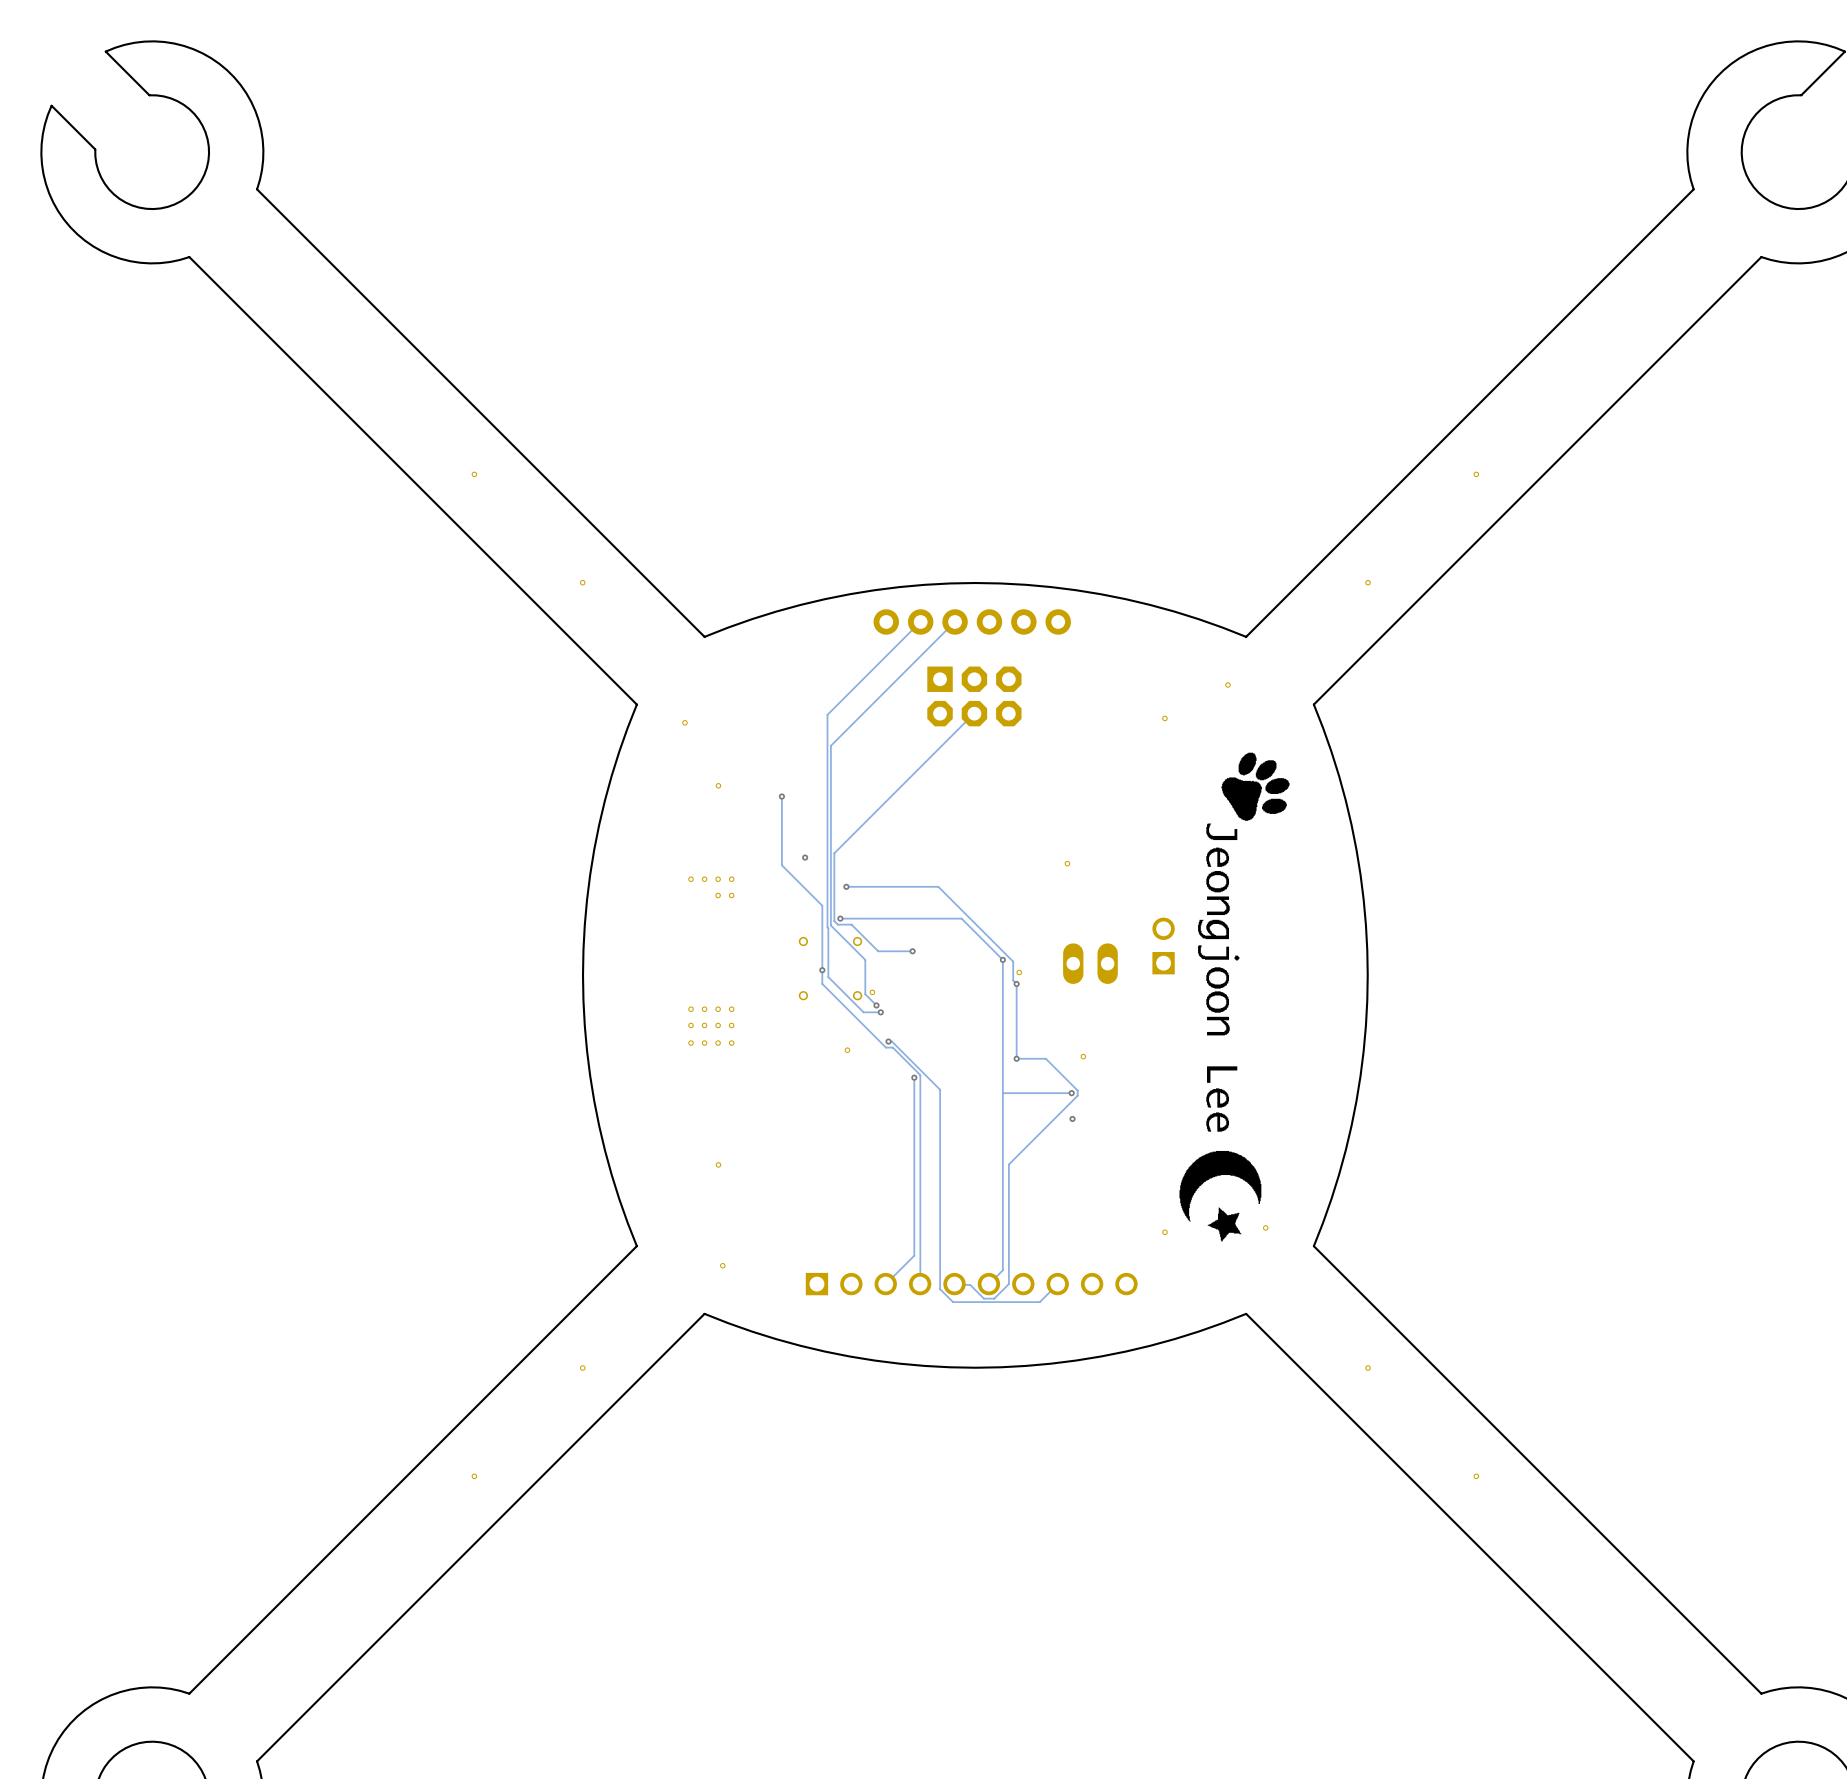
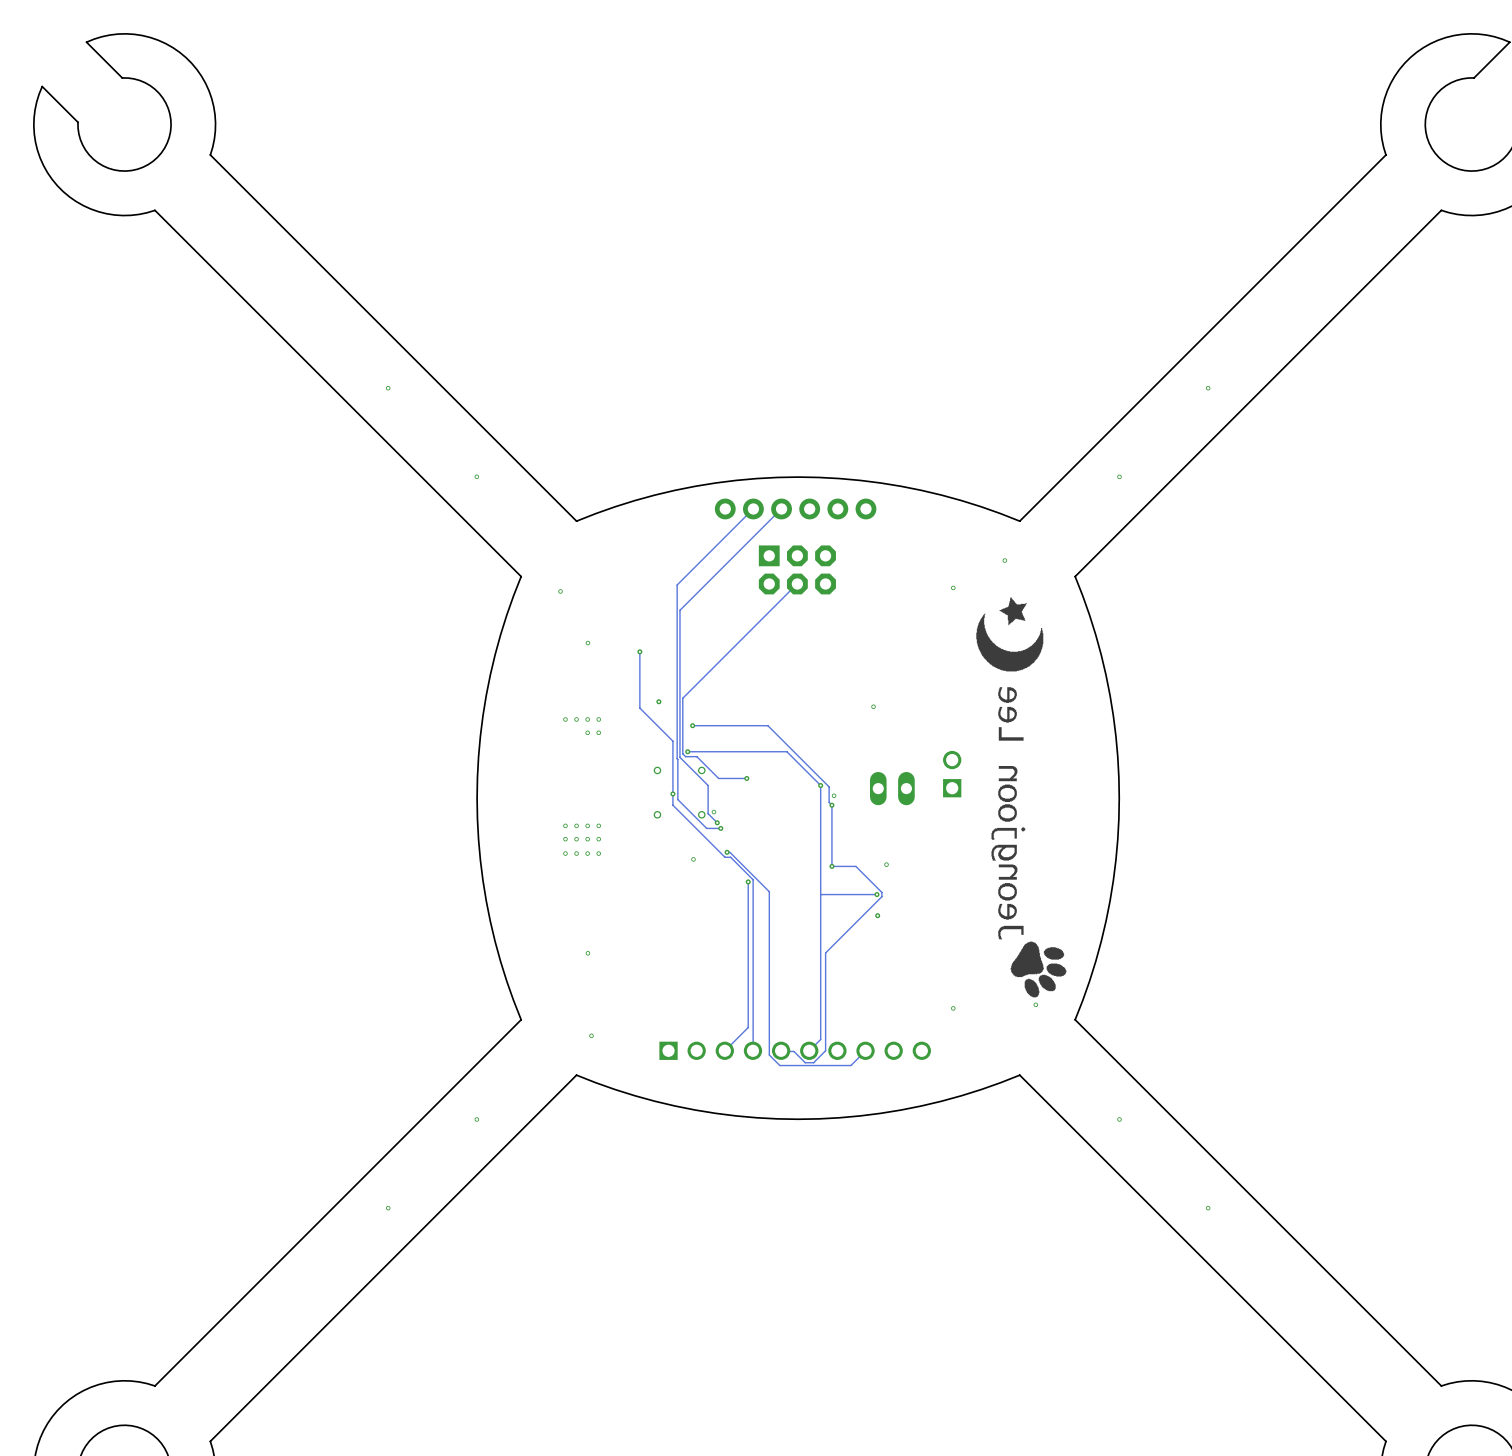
drawing: none -> [976, 597, 1067, 998]
drawing: [1179, 752, 1290, 1242] -> none

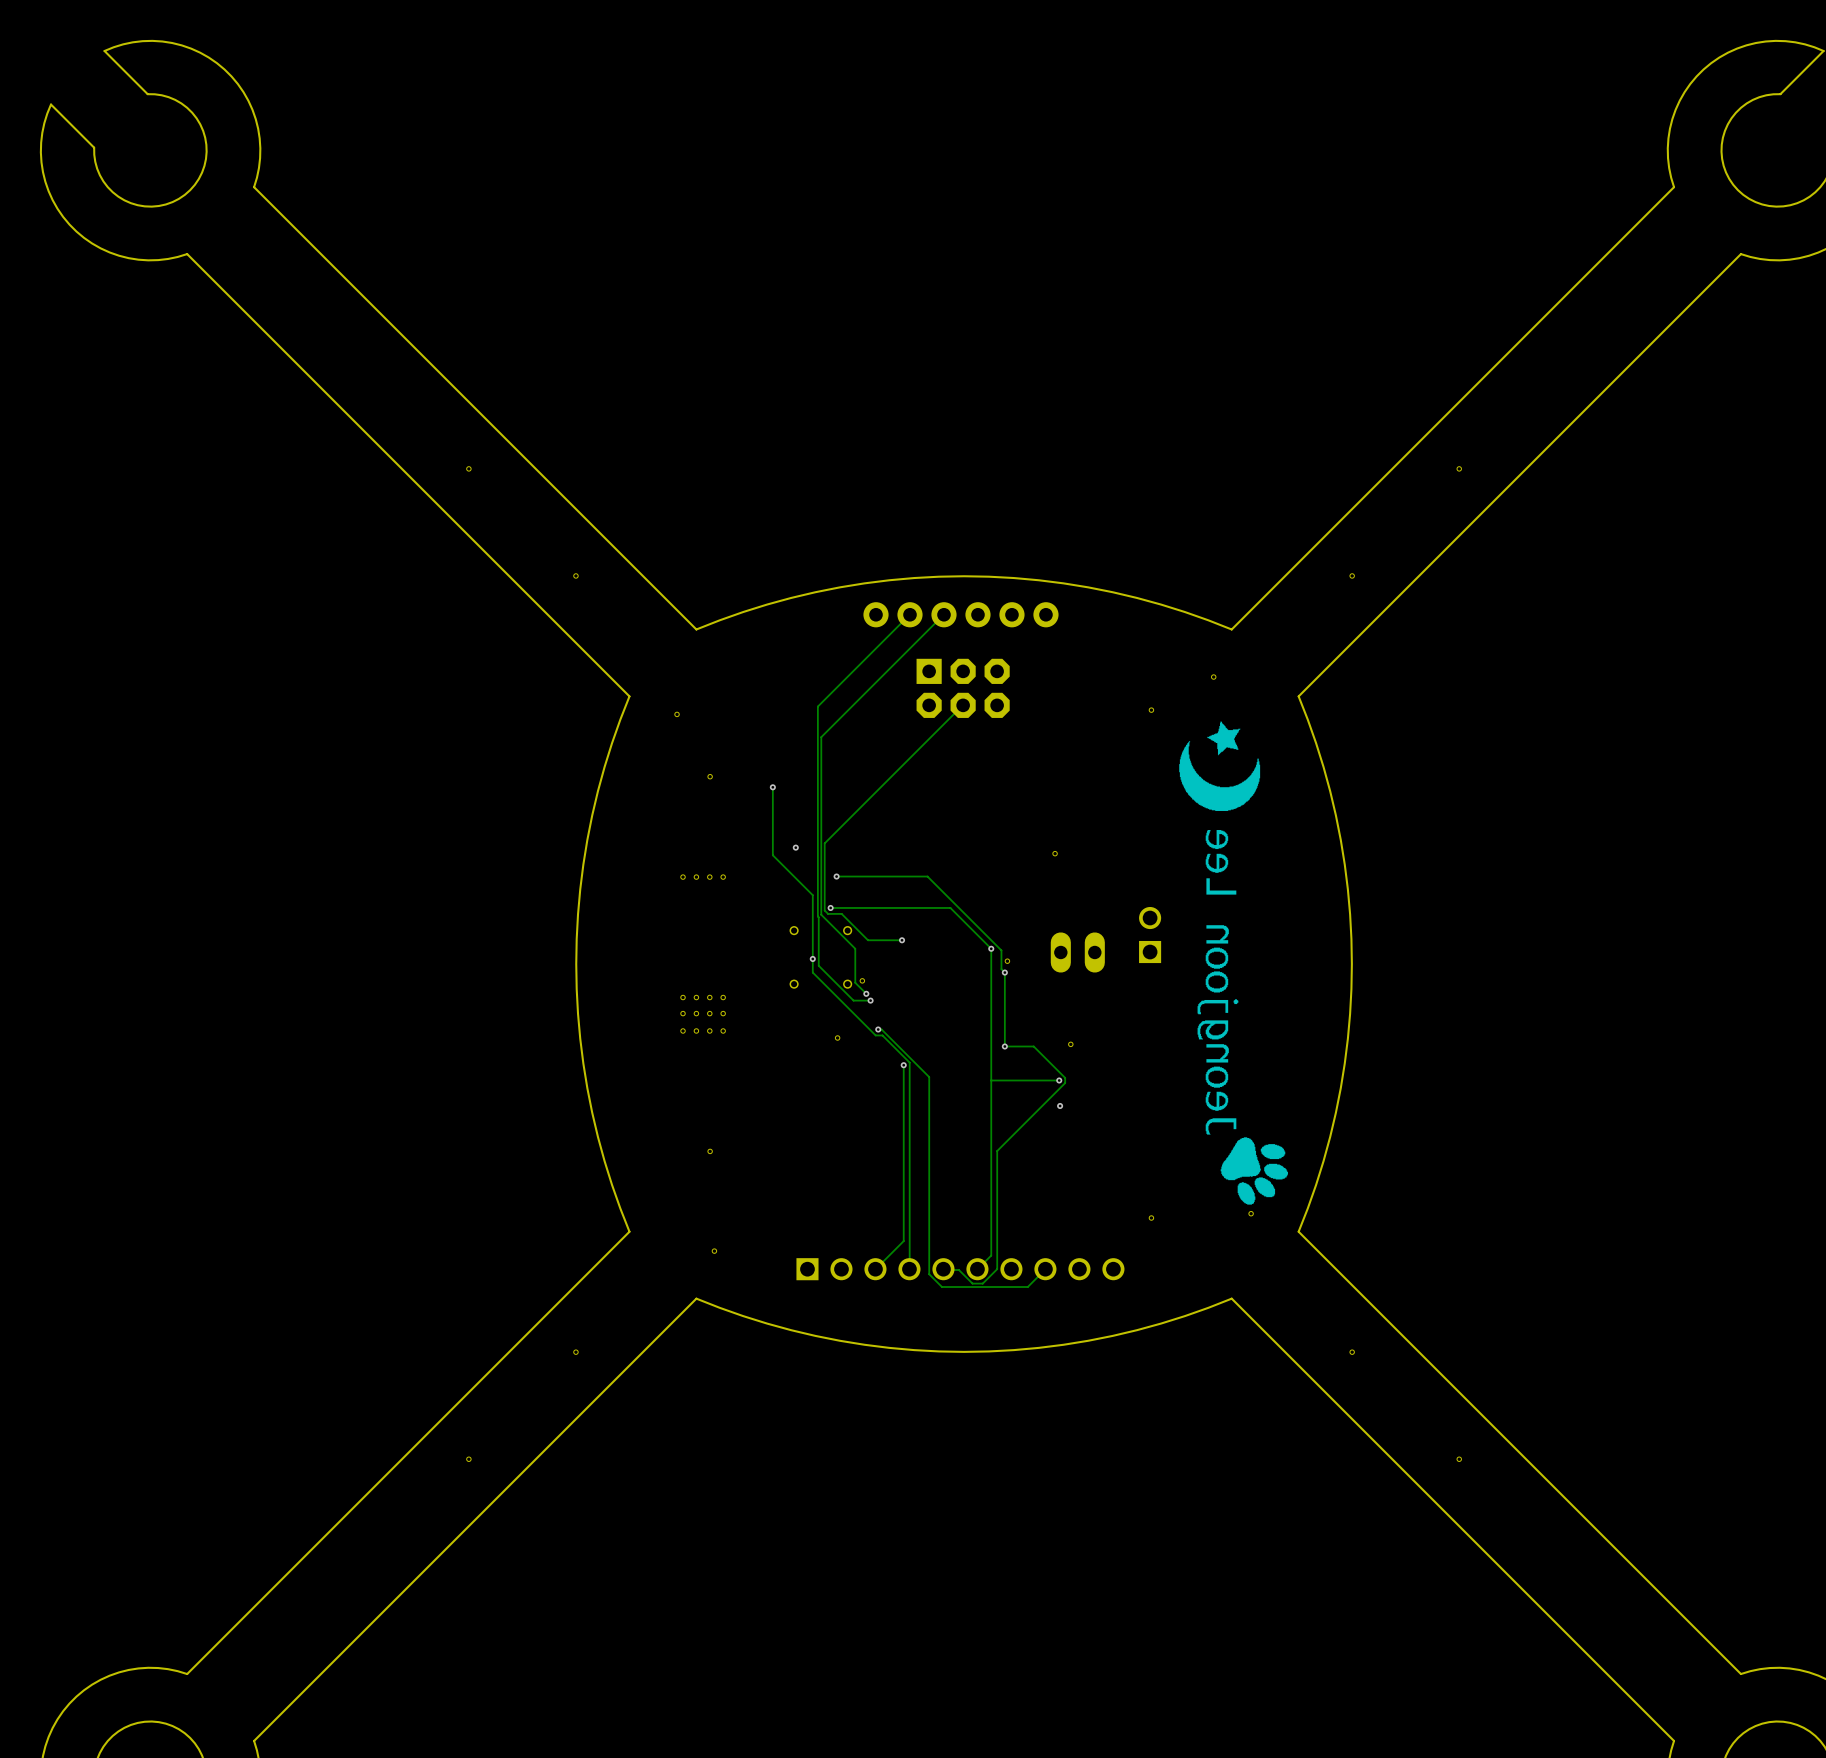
part: (565, 719) -> none
part: (576, 719) -> none
part: (587, 719) -> none
part: (598, 719) -> none
part: none -> (683, 877)
part: none -> (696, 877)
part: none -> (709, 877)
part: none -> (723, 877)
part: (587, 732) -> none
part: (598, 732) -> none

